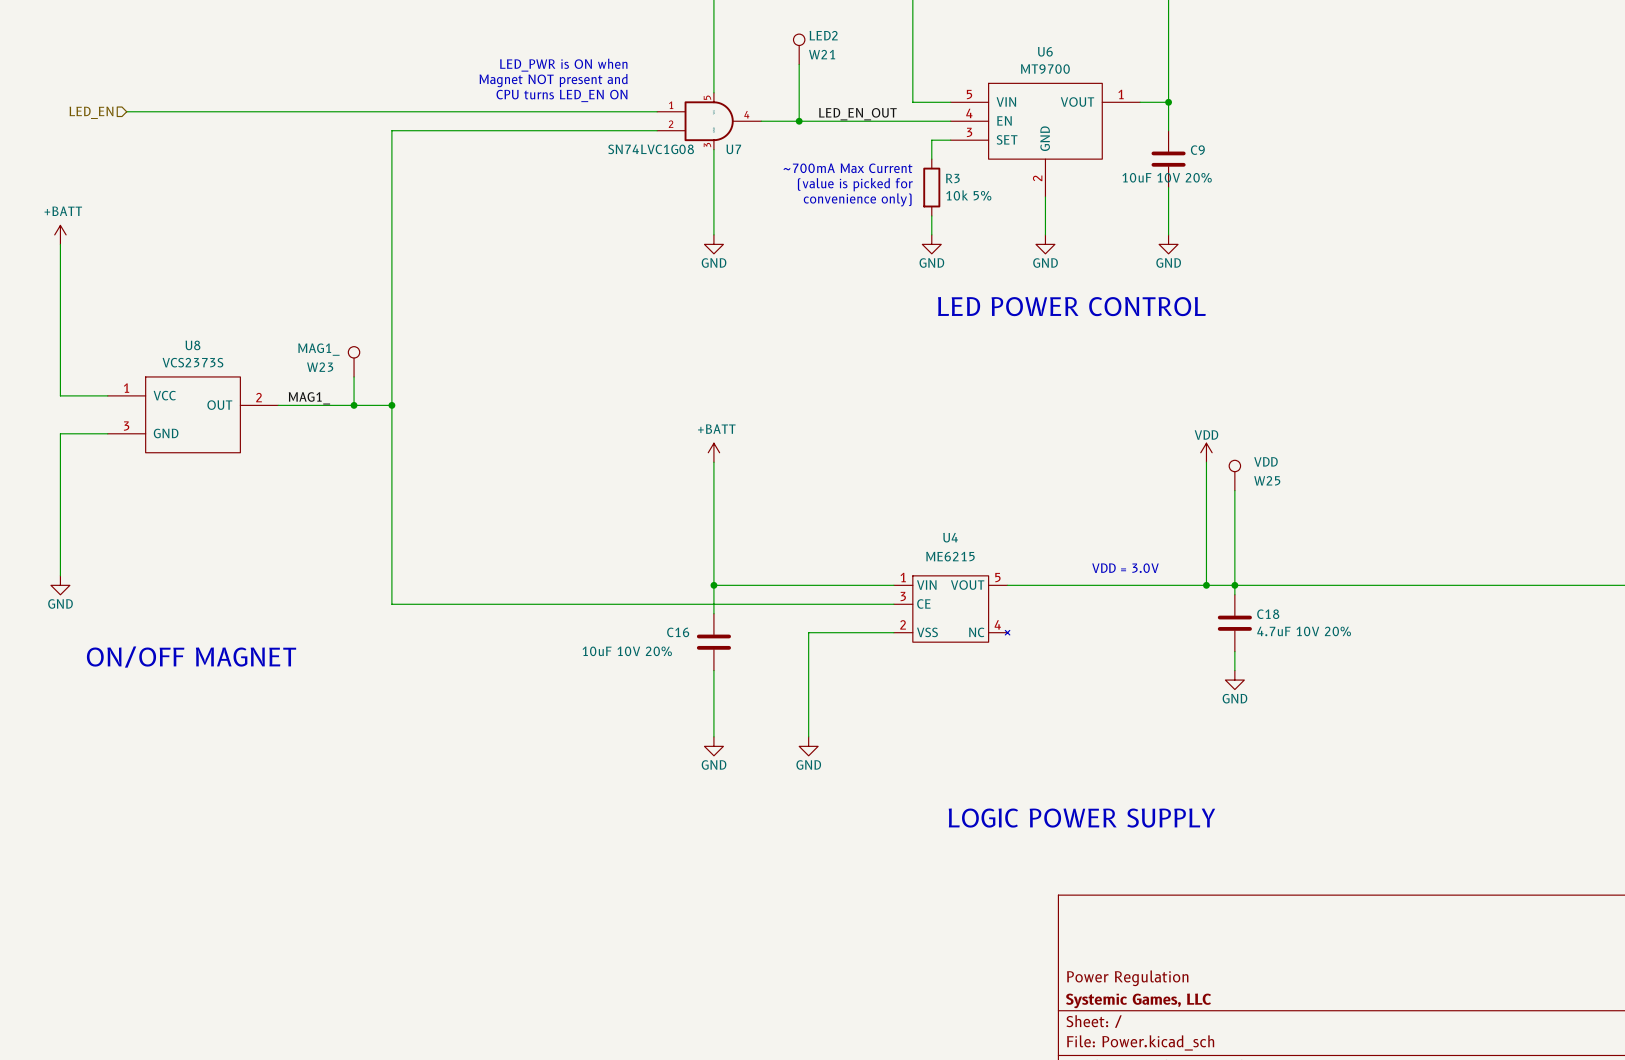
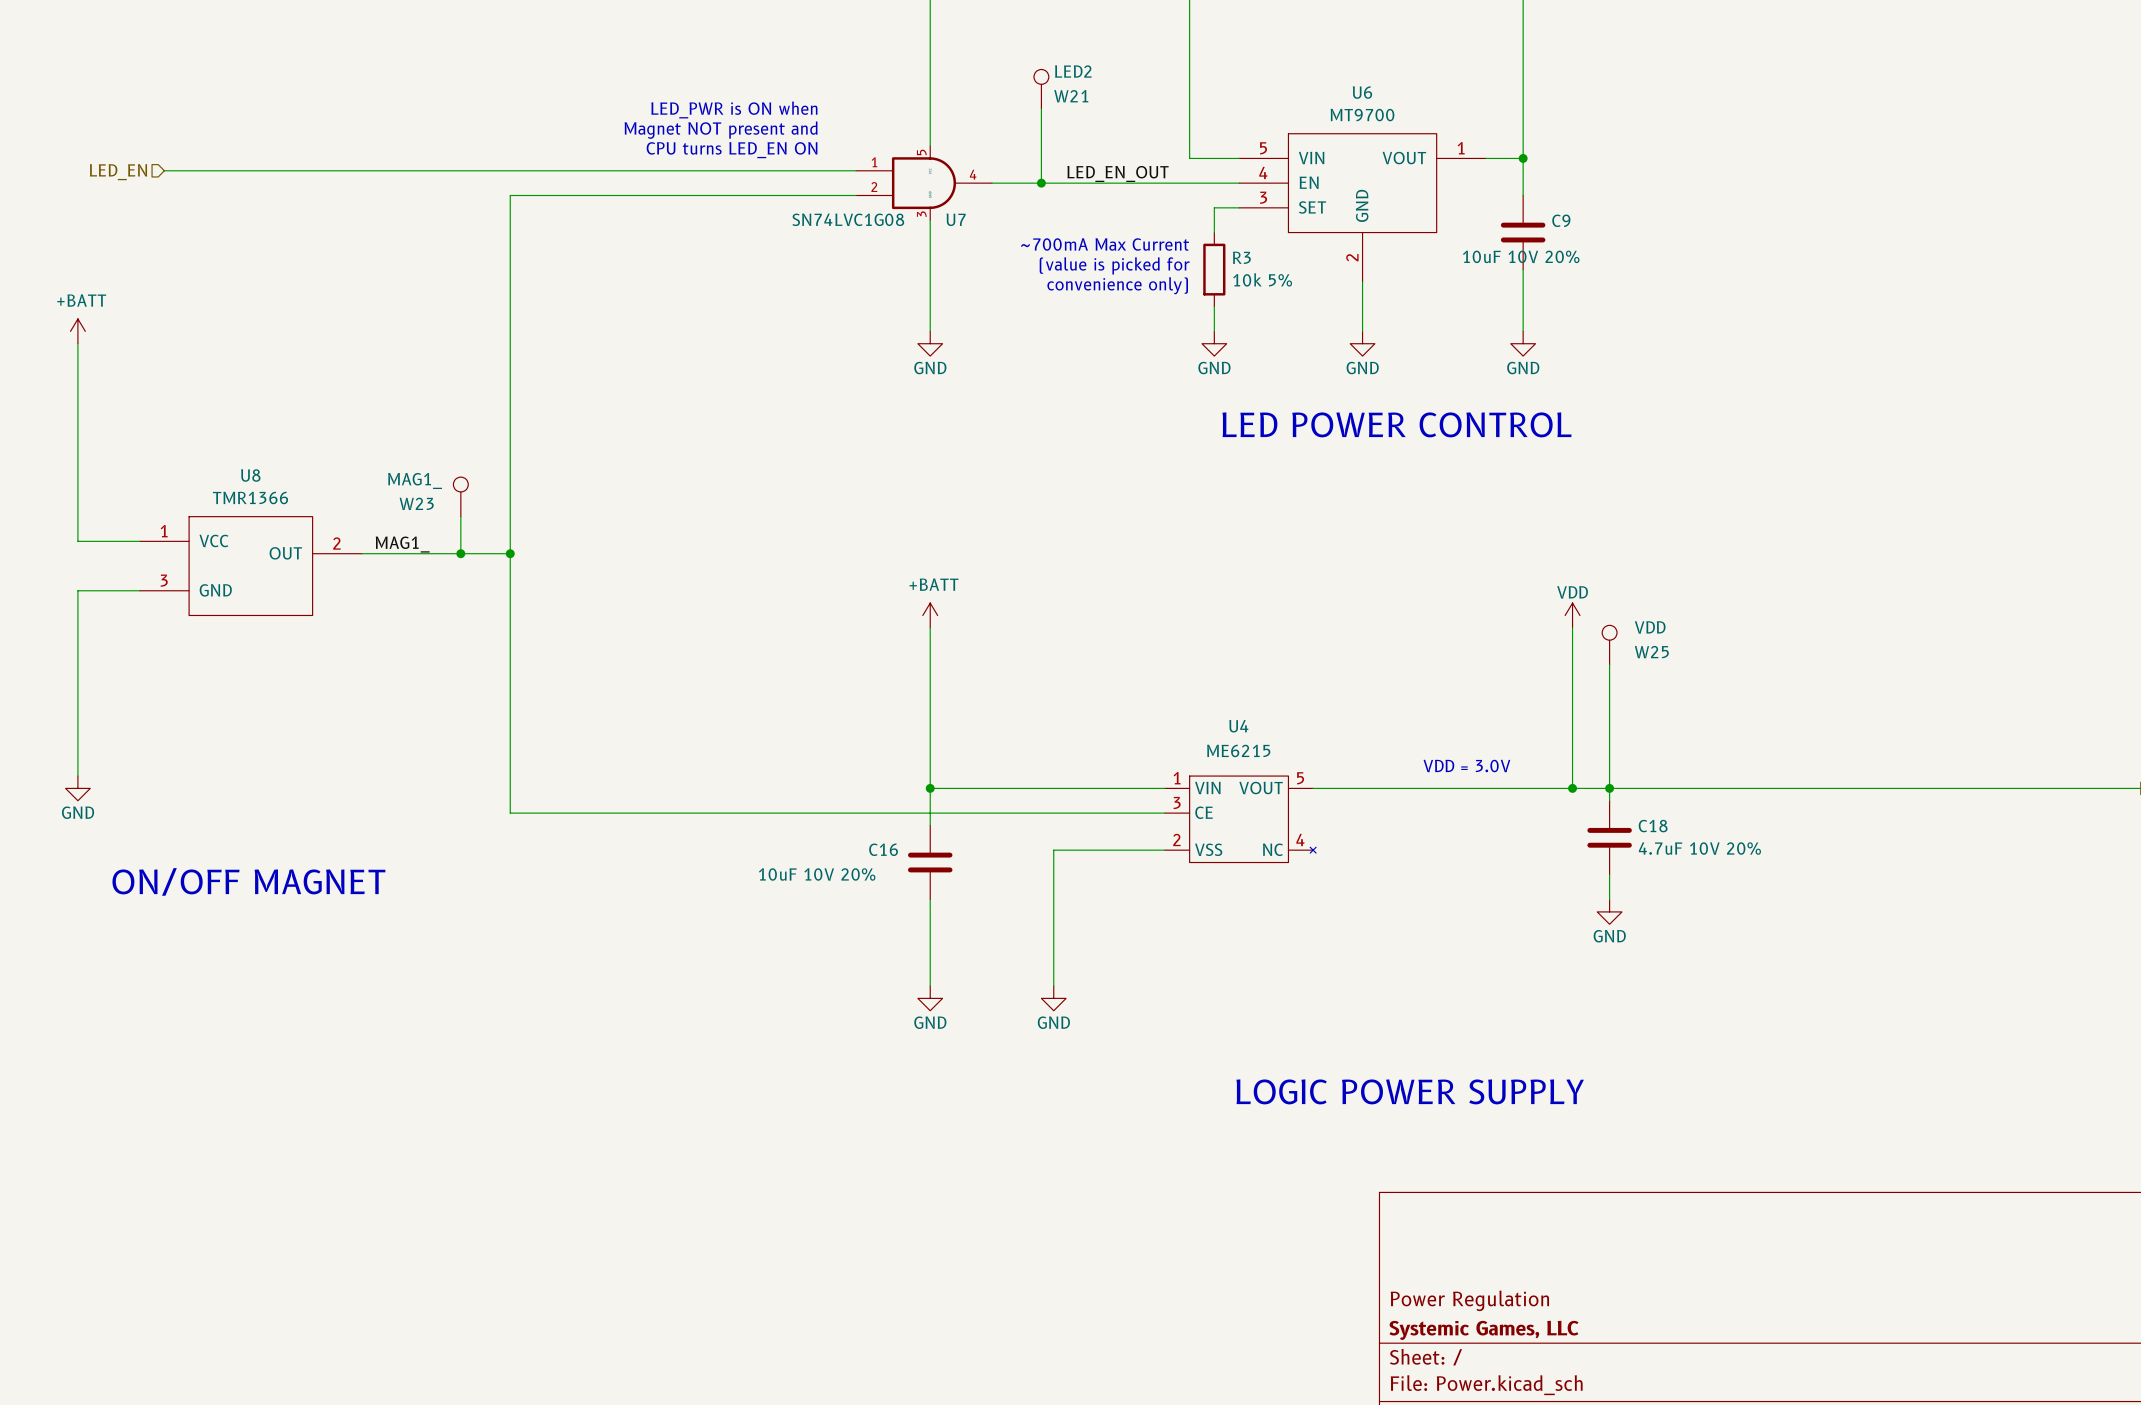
U8 value: VCS2373S (192, 362) -> TMR1366 (250, 497)

